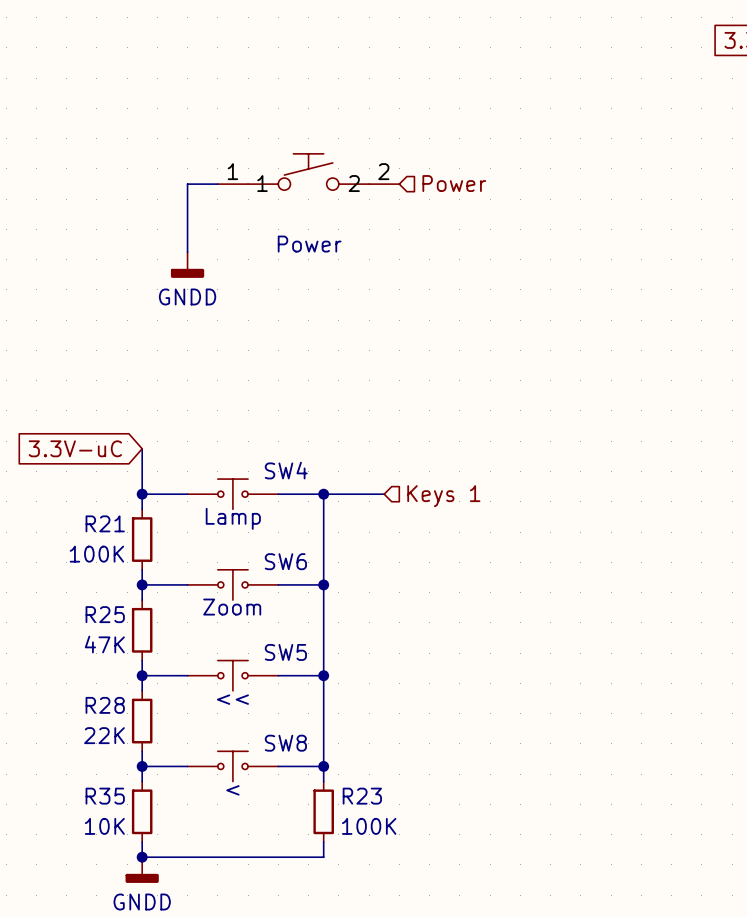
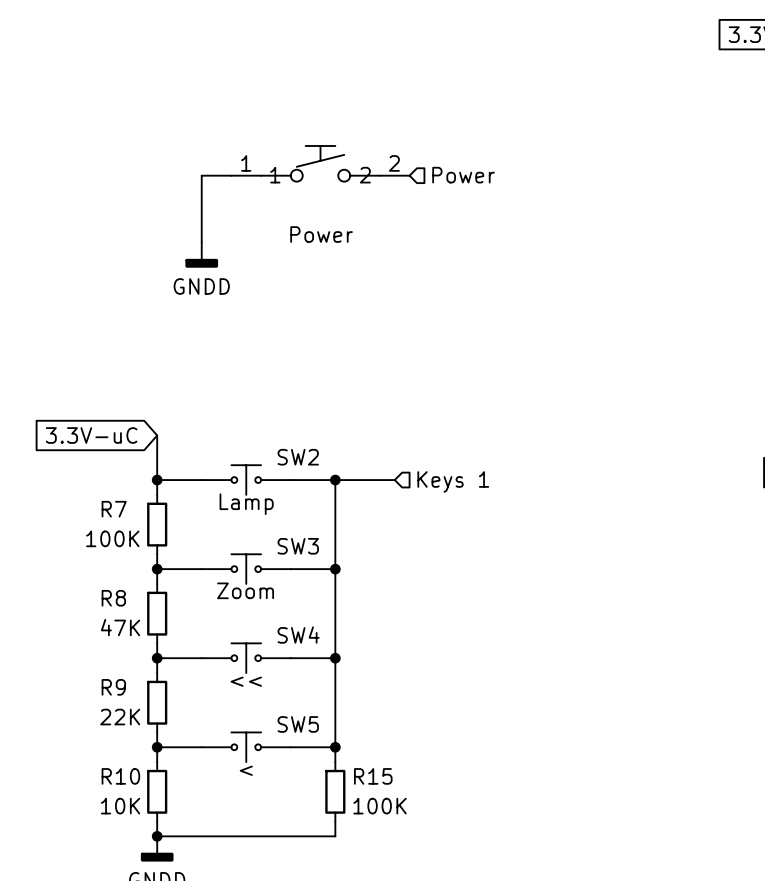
SW4 name: SW4 (286, 470) -> SW2 (298, 457)
R21 name: R21 (105, 523) -> R7 (114, 509)
SW6 name: SW6 (285, 561) -> SW3 (298, 546)
R25 name: R25 (105, 614) -> R8 (113, 598)
SW5 name: SW5 (285, 652) -> SW4 (298, 635)
R28 name: R28 (105, 705) -> R9 (113, 687)
SW8 name: SW8 (285, 743) -> SW5 (298, 724)
R35 name: R35 (105, 796) -> R10 (120, 776)
R23 name: R23 (362, 796) -> R15 (373, 776)

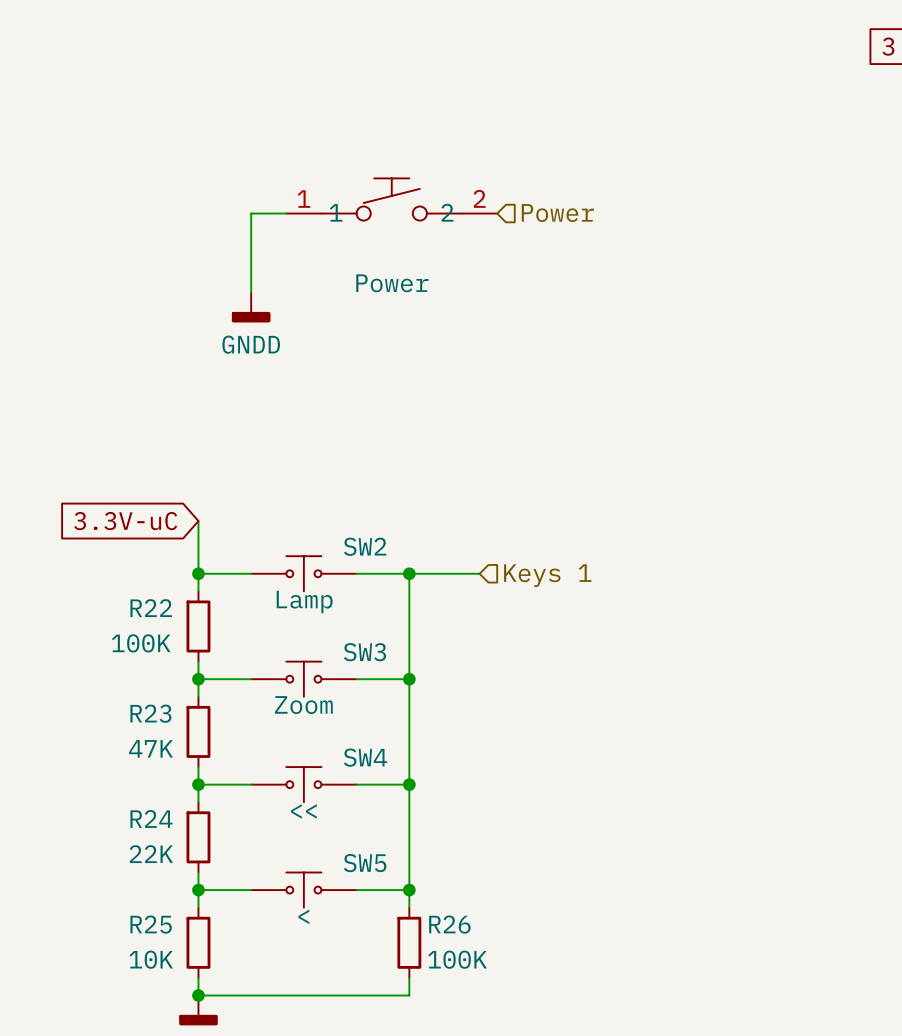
R7 name: R7 (114, 509) -> R22 (151, 608)
R8 name: R8 (113, 598) -> R23 (150, 713)
R9 name: R9 (113, 687) -> R24 (151, 818)
R10 name: R10 (120, 776) -> R25 (151, 924)
R15 name: R15 (373, 776) -> R26 (449, 924)

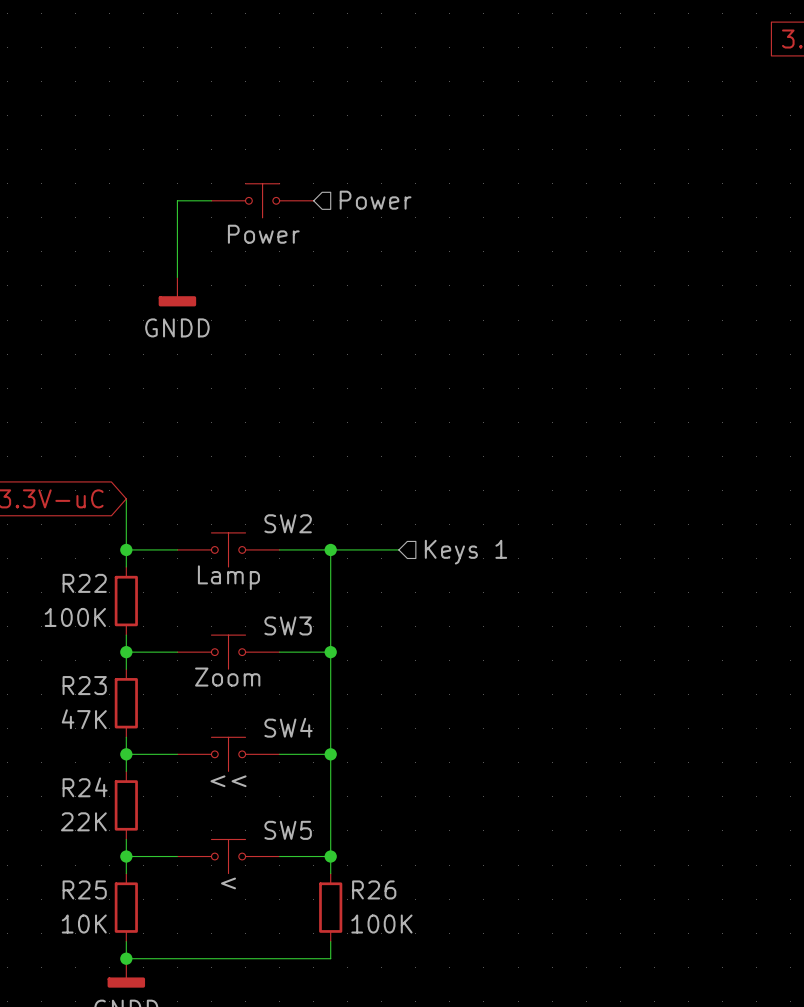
part: Power (391, 199) -> none
part: none -> Power (262, 200)
hierarchical label position: Power (557, 213) -> Power (375, 200)

